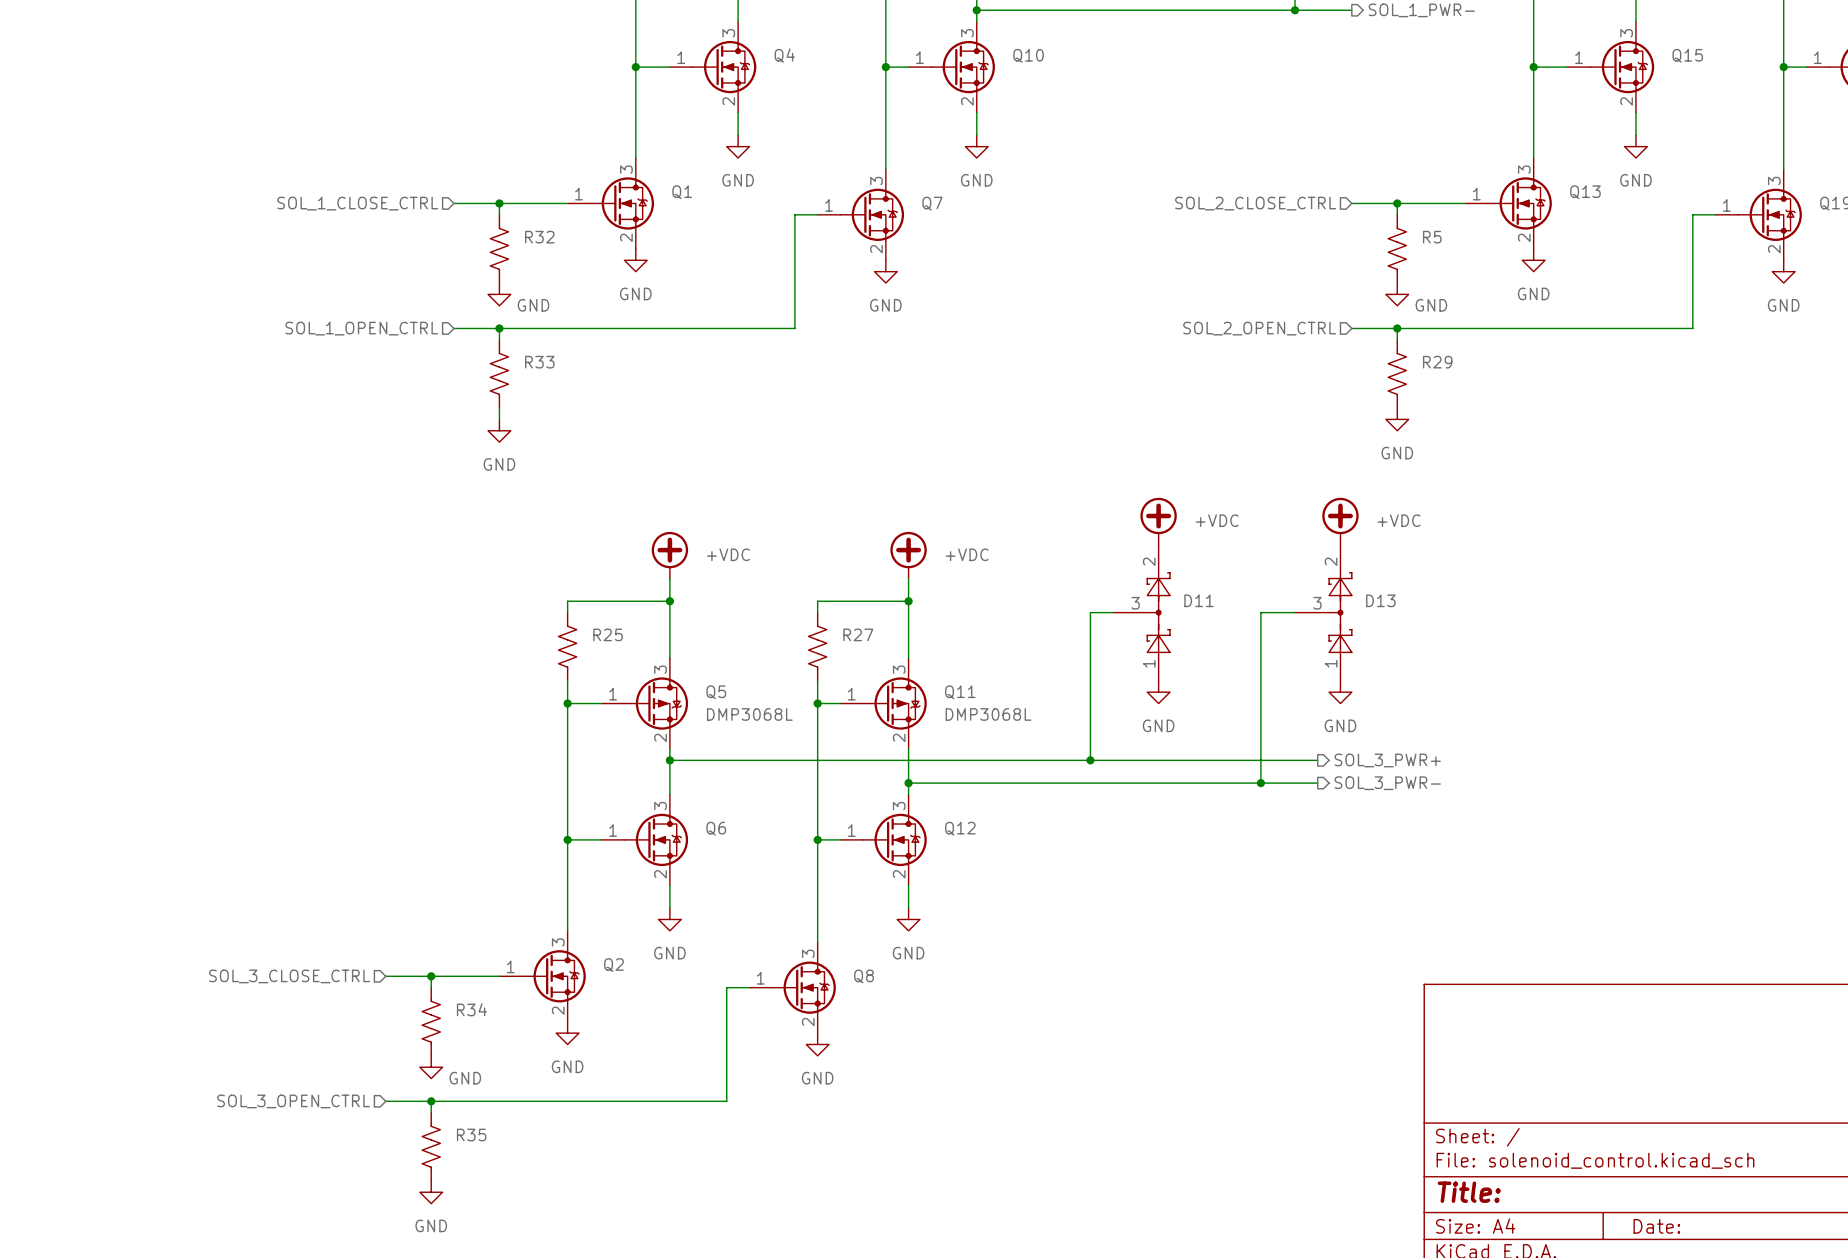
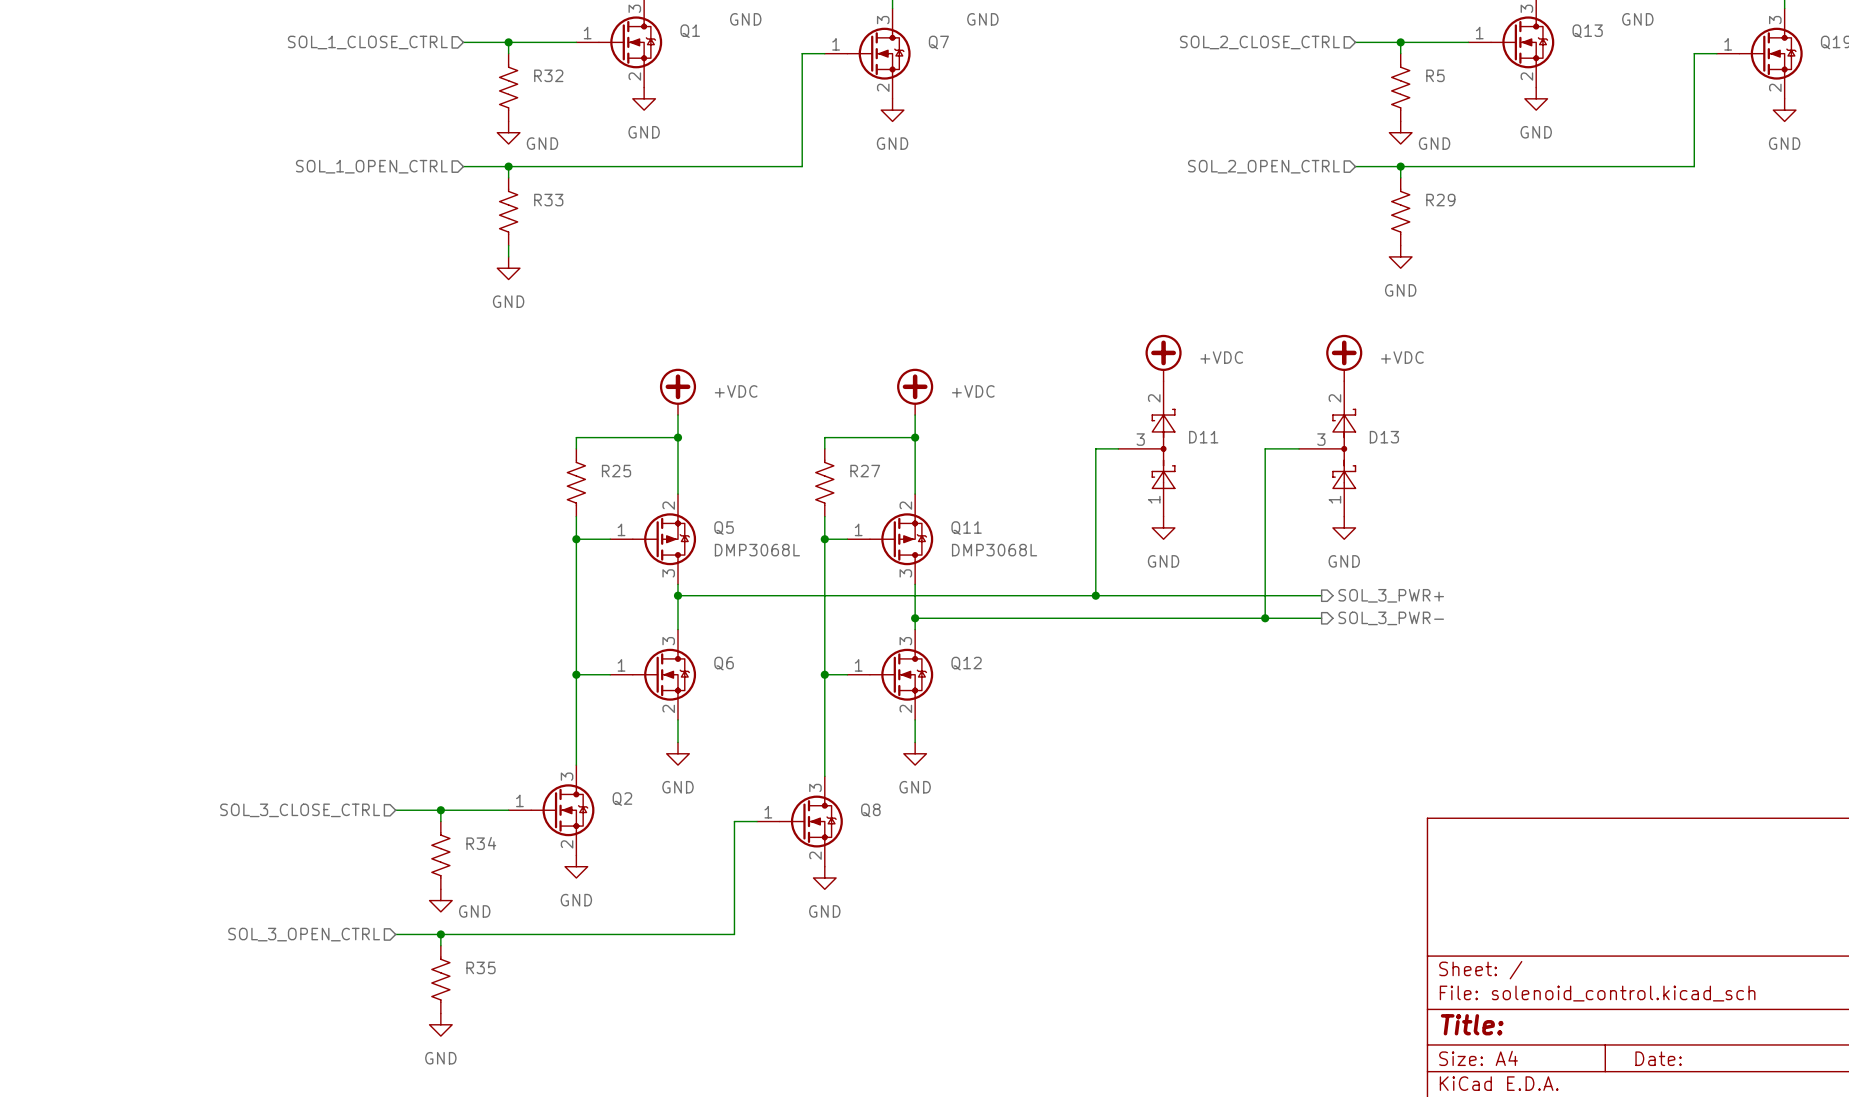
Q5 flip: as is (656, 703) -> up-down (664, 539)
Q11 flip: as is (894, 703) -> up-down (901, 539)

